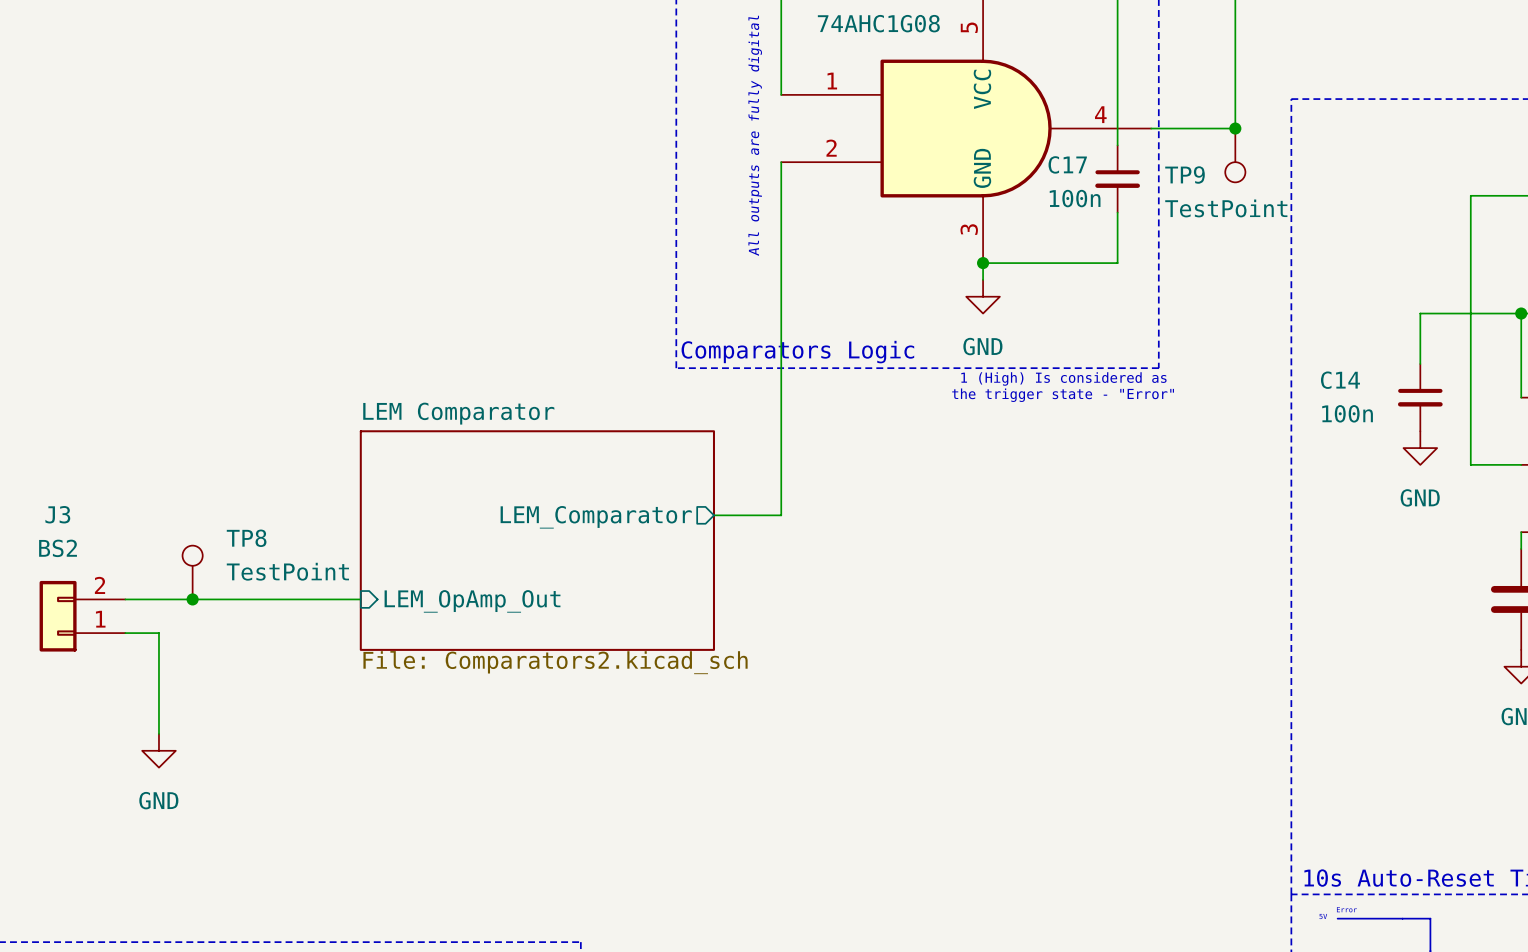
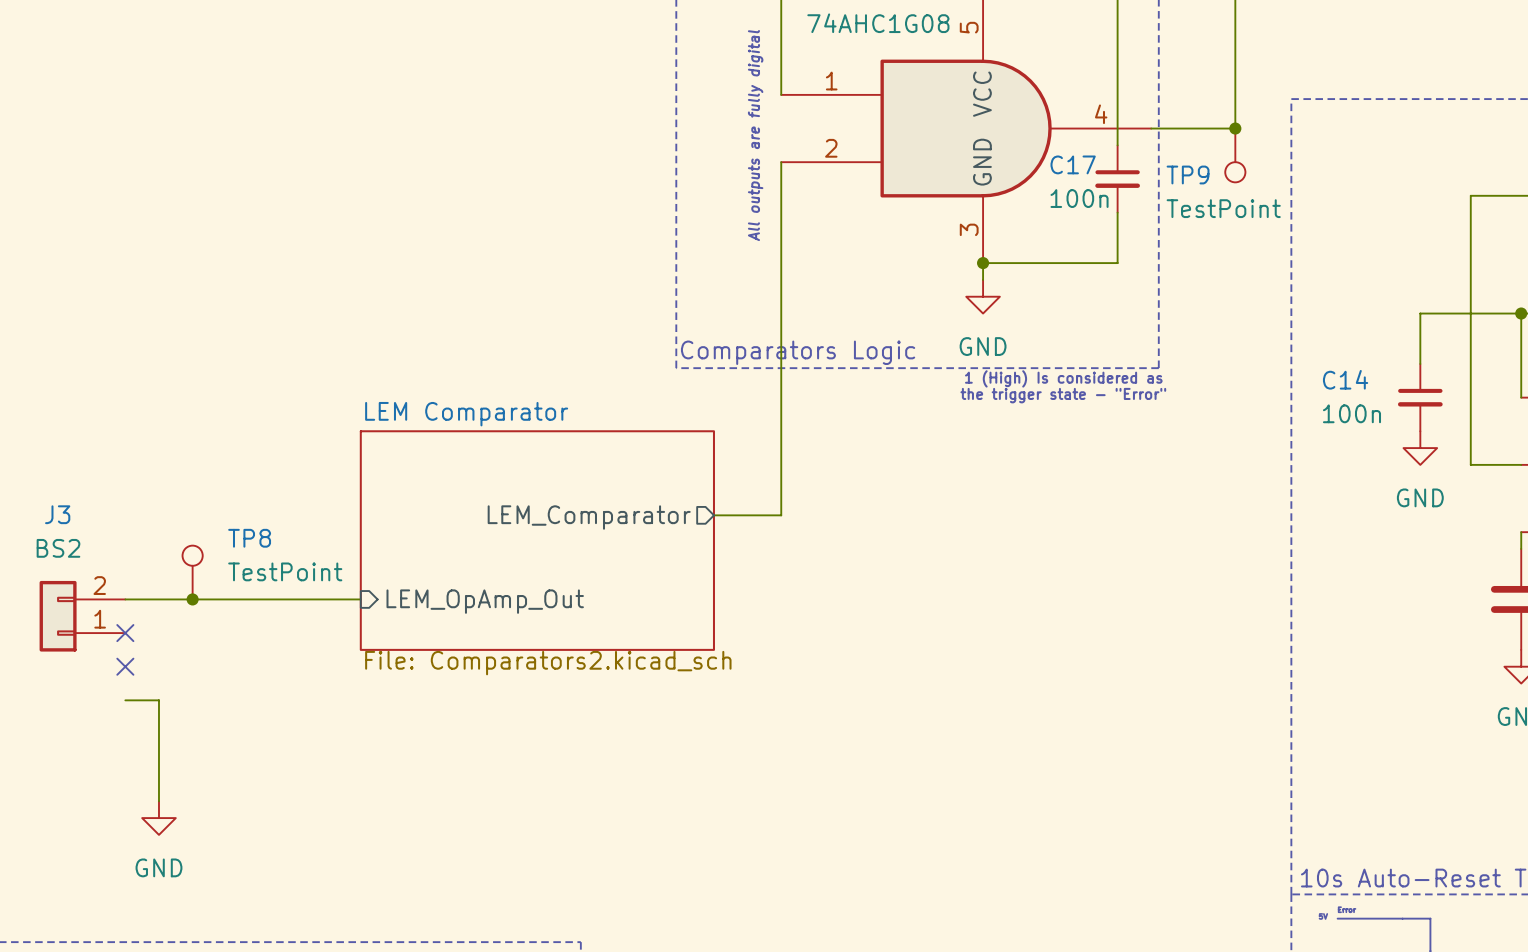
wire: (125, 633) (158, 633) (158, 700) -> (125, 700) (158, 700)
no-connect mark: none -> (125, 633)
no-connect mark: none -> (125, 666)
wire: none -> (158, 733) (158, 801)
power symbol position: GND (158, 750) -> GND (158, 818)

